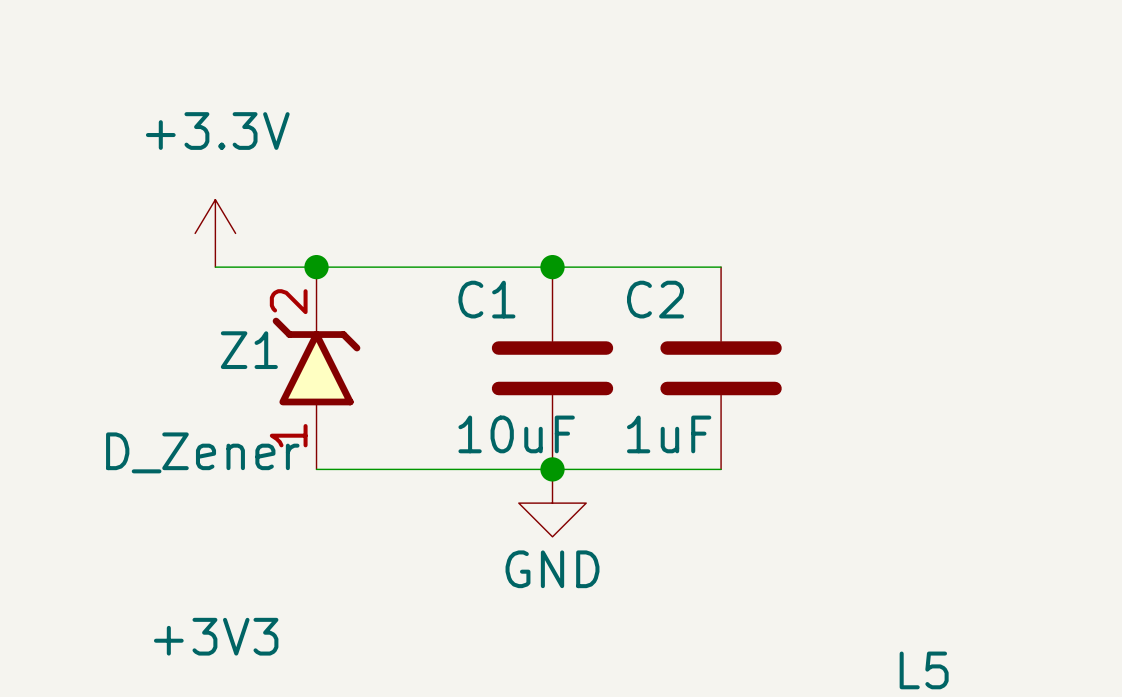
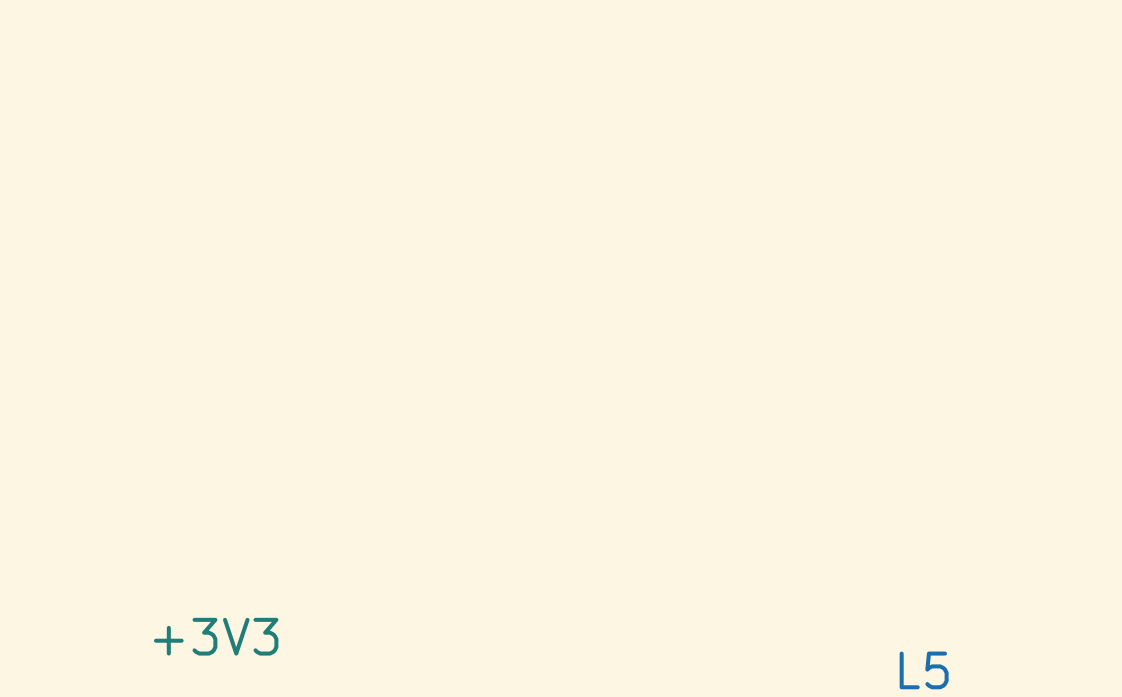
power symbol: +3.3V (215, 233) -> none
wire: (215, 267) (721, 267) -> none
junction: (316, 267) -> none
junction: (552, 267) -> none
Z1: D_Zener (316, 368) -> none
C1: 10uF (552, 368) -> none
C2: 1uF (721, 368) -> none
wire: (316, 469) (721, 469) -> none
junction: (552, 469) -> none
power symbol: GND (552, 503) -> none

